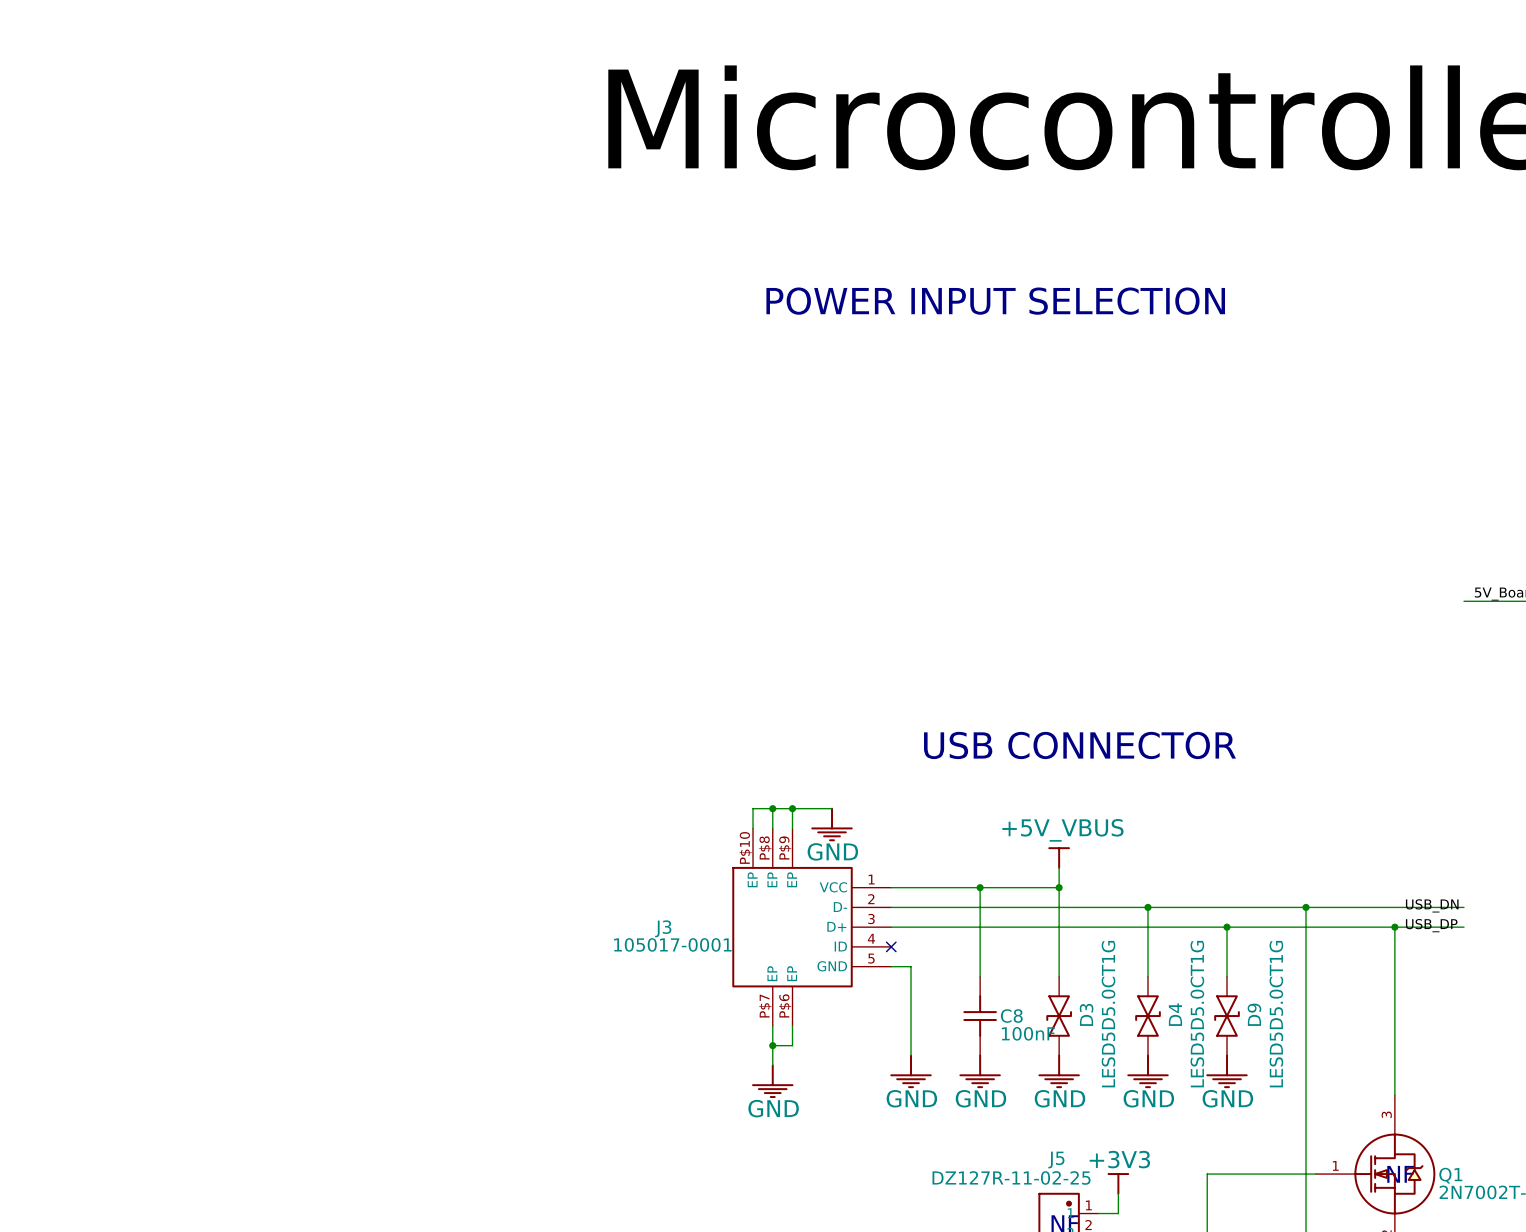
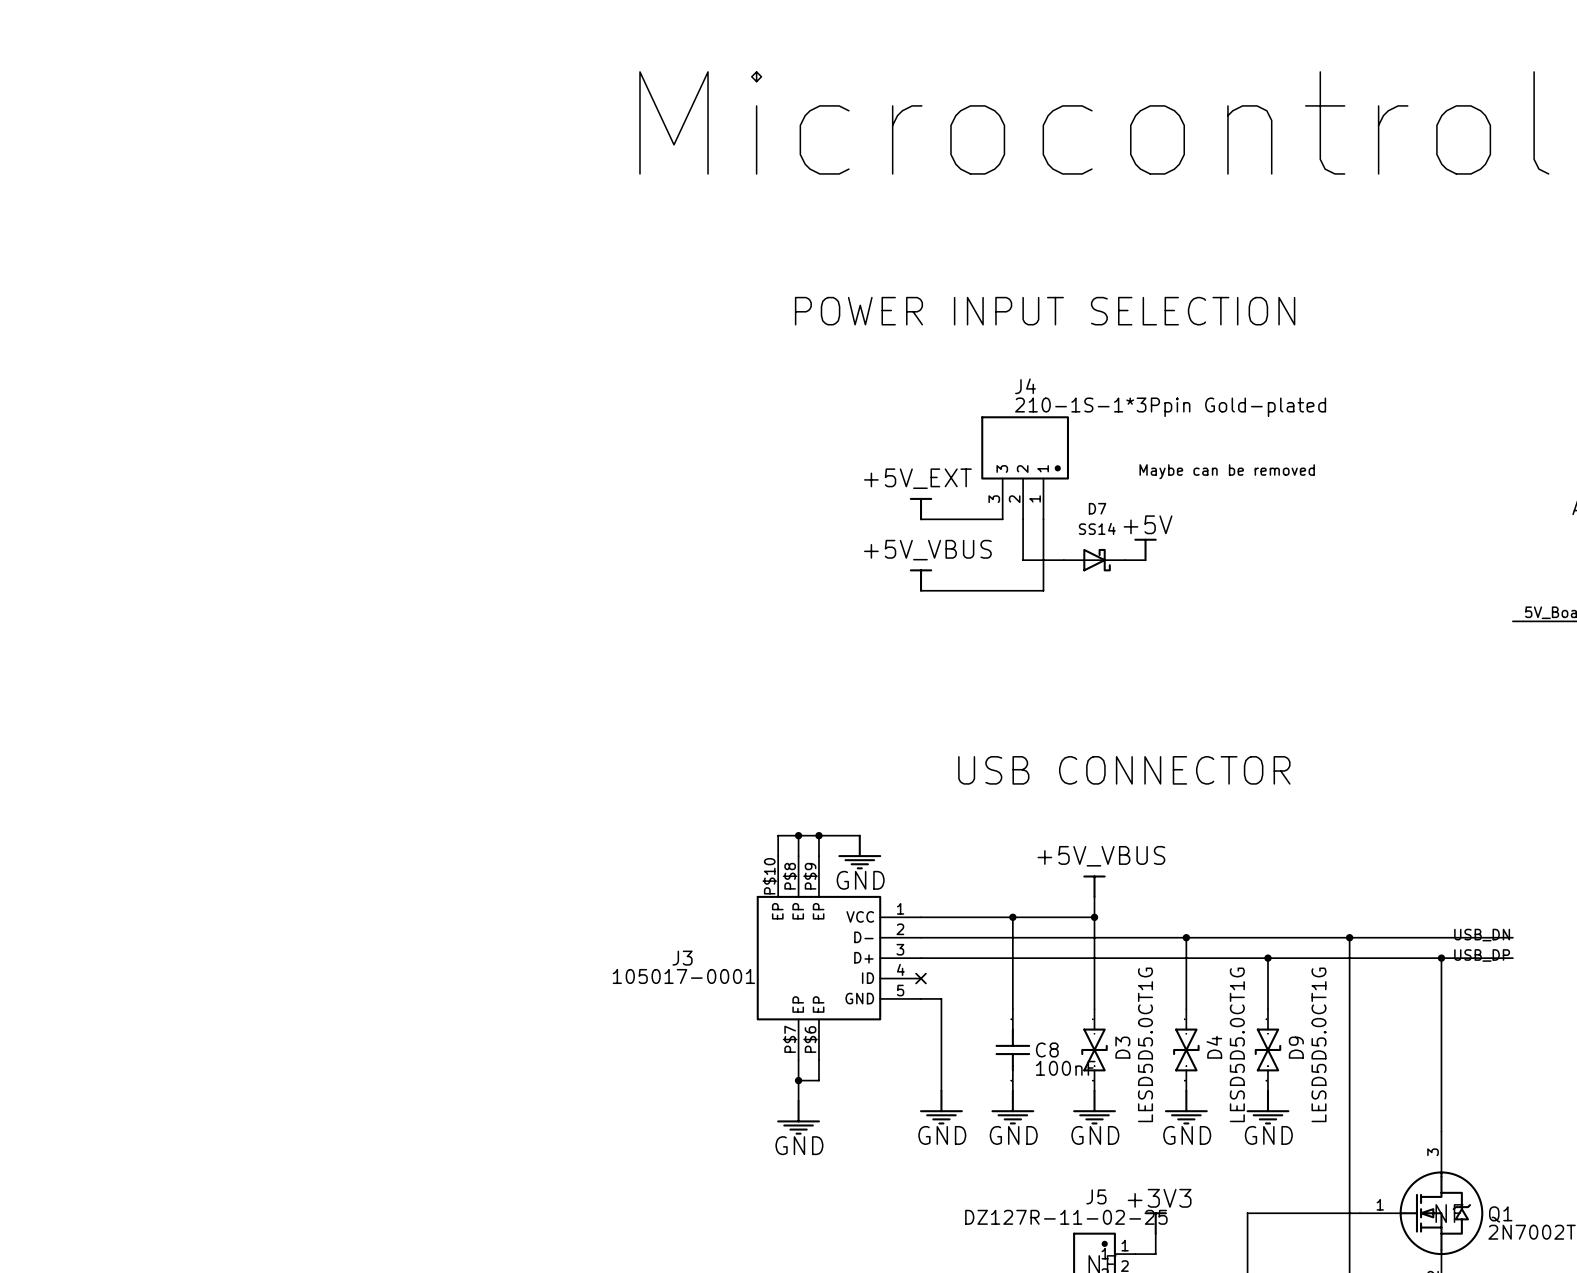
J4: none -> 210-1S-1*3Ppin Gold-plated (1025, 467)
text: none -> Maybe can be removed (1227, 471)
power symbol: none -> +5V_EXT (921, 509)
wire: none -> (921, 519) (1002, 519)
wire: none -> (1023, 519) (1023, 560) (1063, 560)
wire: none -> (1043, 519) (1043, 590) (921, 590)
power symbol: none -> +5V (1145, 549)
D7: none -> SS14 (1094, 560)
wire: none -> (1125, 560) (1145, 560)
power symbol: none -> +5V_VBUS (921, 580)

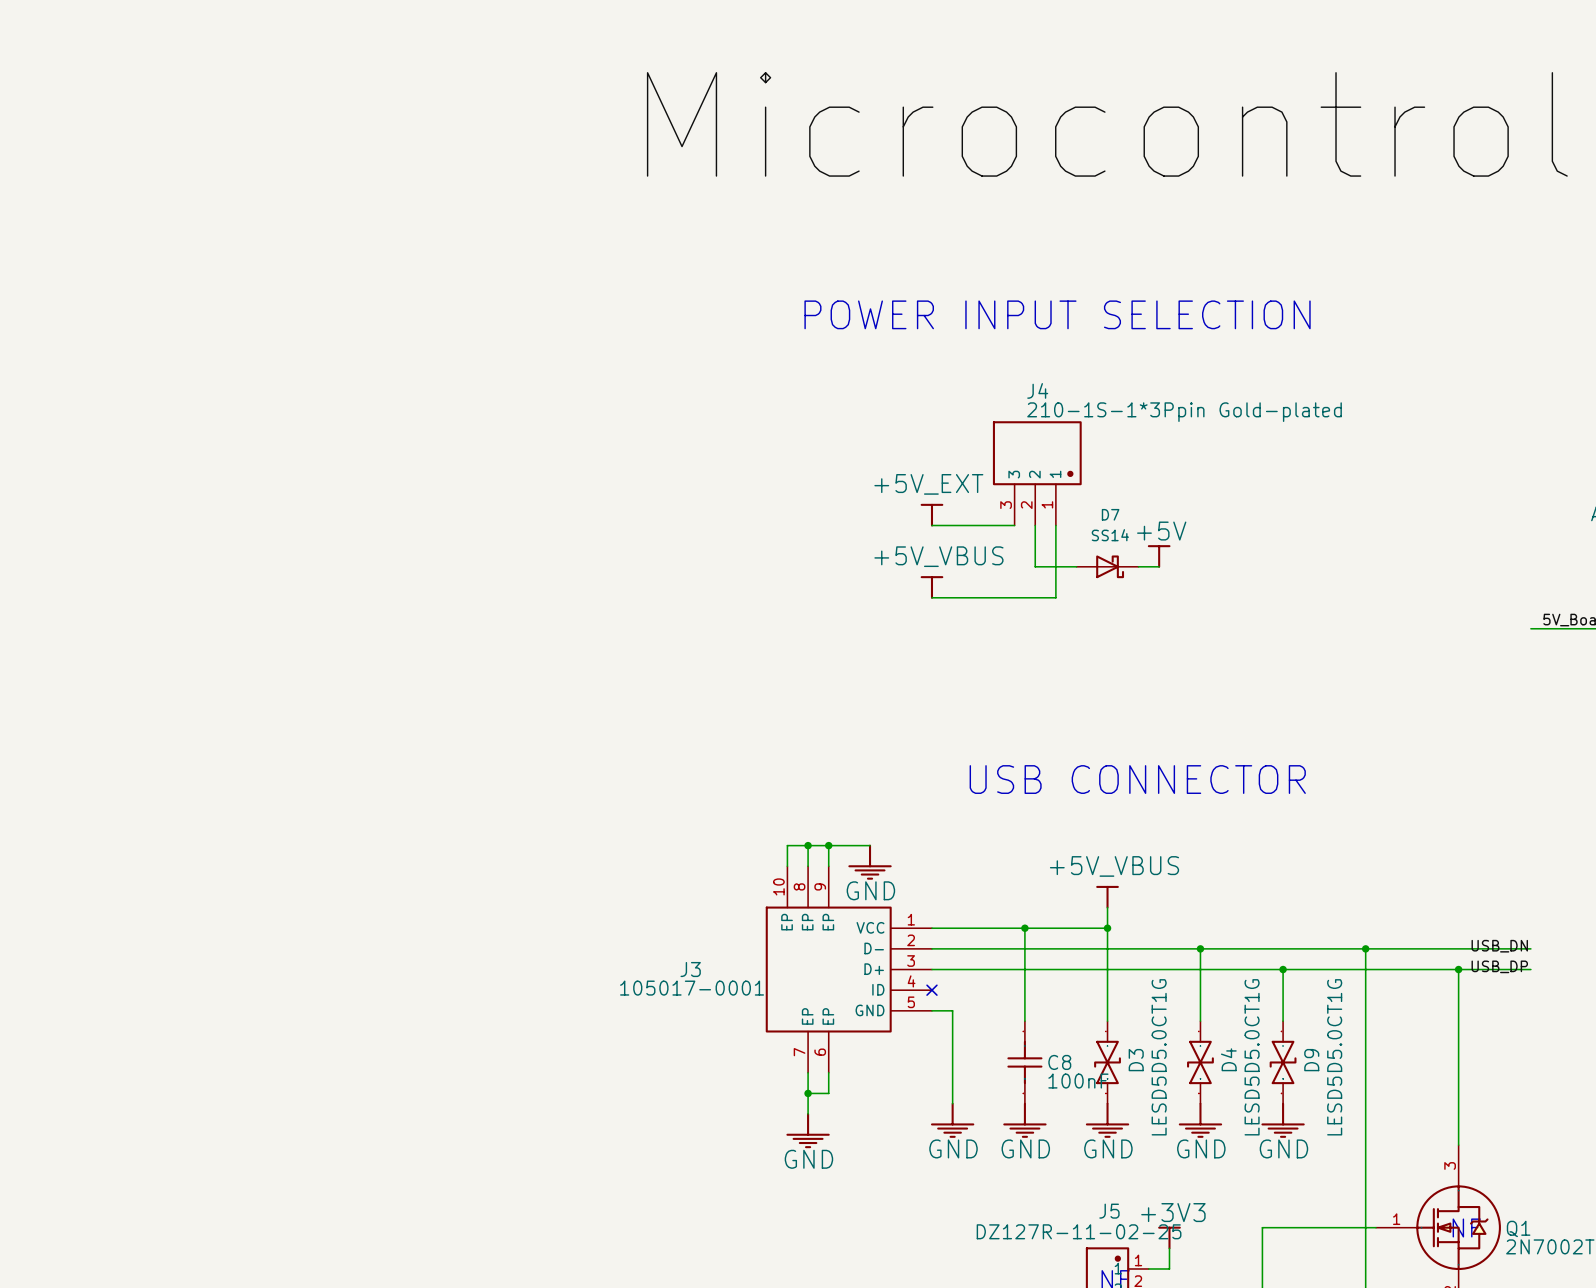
text: Maybe can be removed (1227, 471) -> none
J3 pin number: P$10 (769, 876) -> 10 (778, 886)
J3 pin number: P$8 (790, 876) -> 8 (799, 886)
J3 pin number: P$9 (810, 876) -> 9 (820, 886)
J3 pin number: P$7 (790, 1039) -> 7 (799, 1052)
J3 pin number: P$6 (810, 1039) -> 6 (820, 1052)

